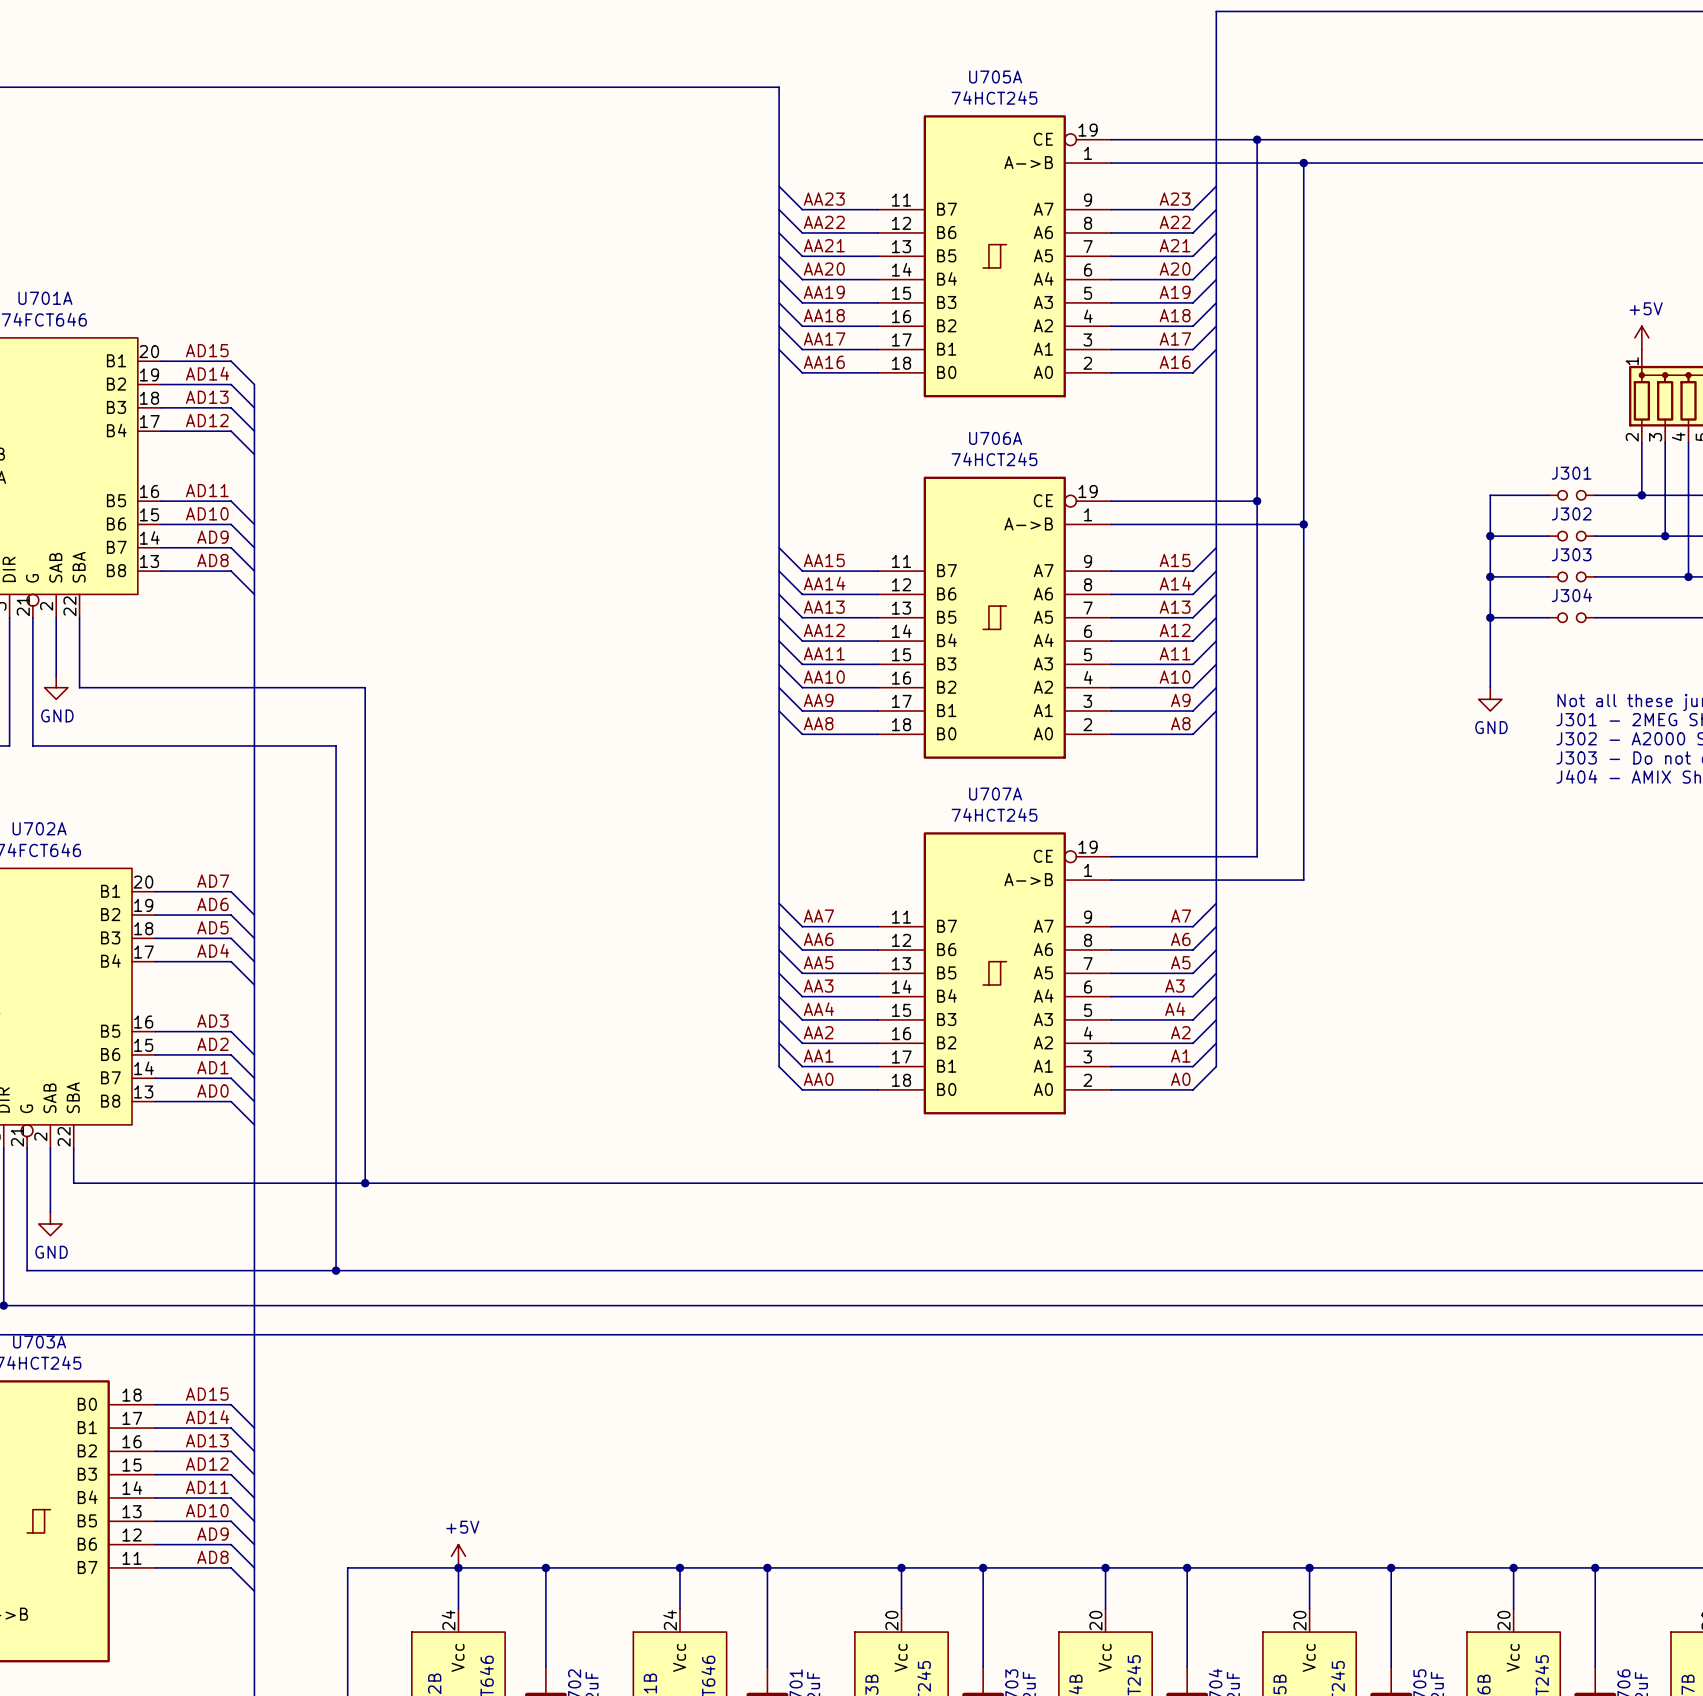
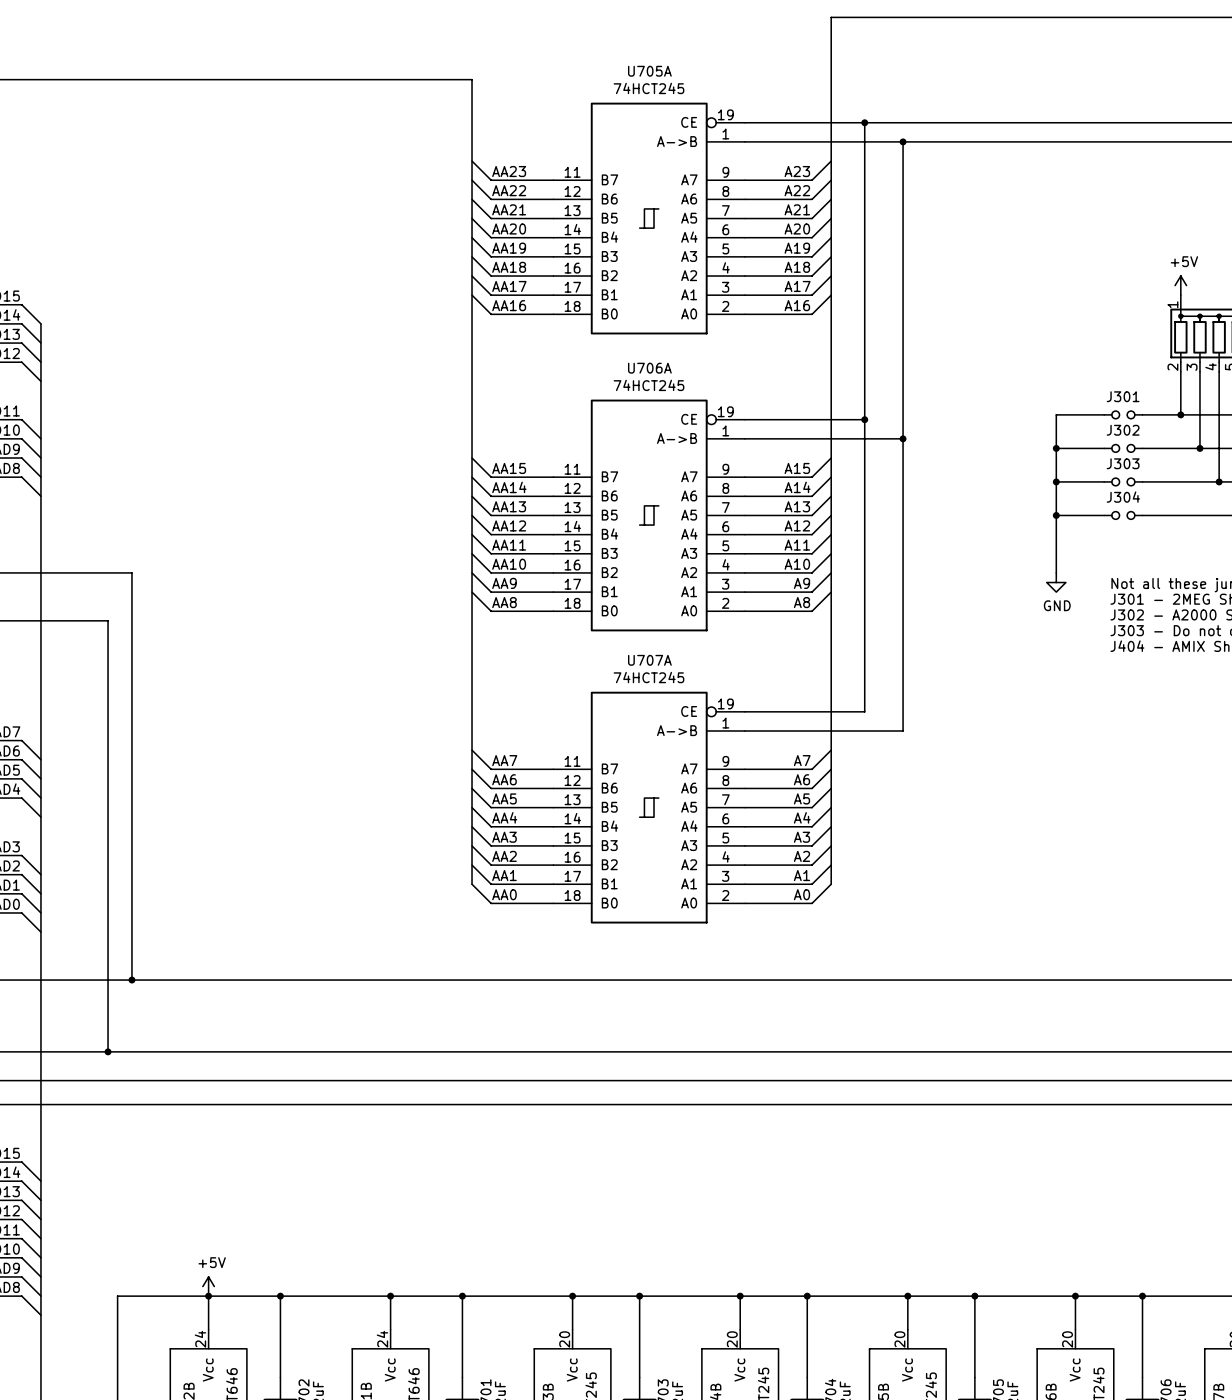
label: AA3 (818, 986) -> AA4 (504, 817)
label: A3 (1174, 986) -> A4 (802, 817)
label: AA4 (818, 1009) -> AA3 (504, 837)
label: A4 (1175, 1009) -> A3 (801, 837)

